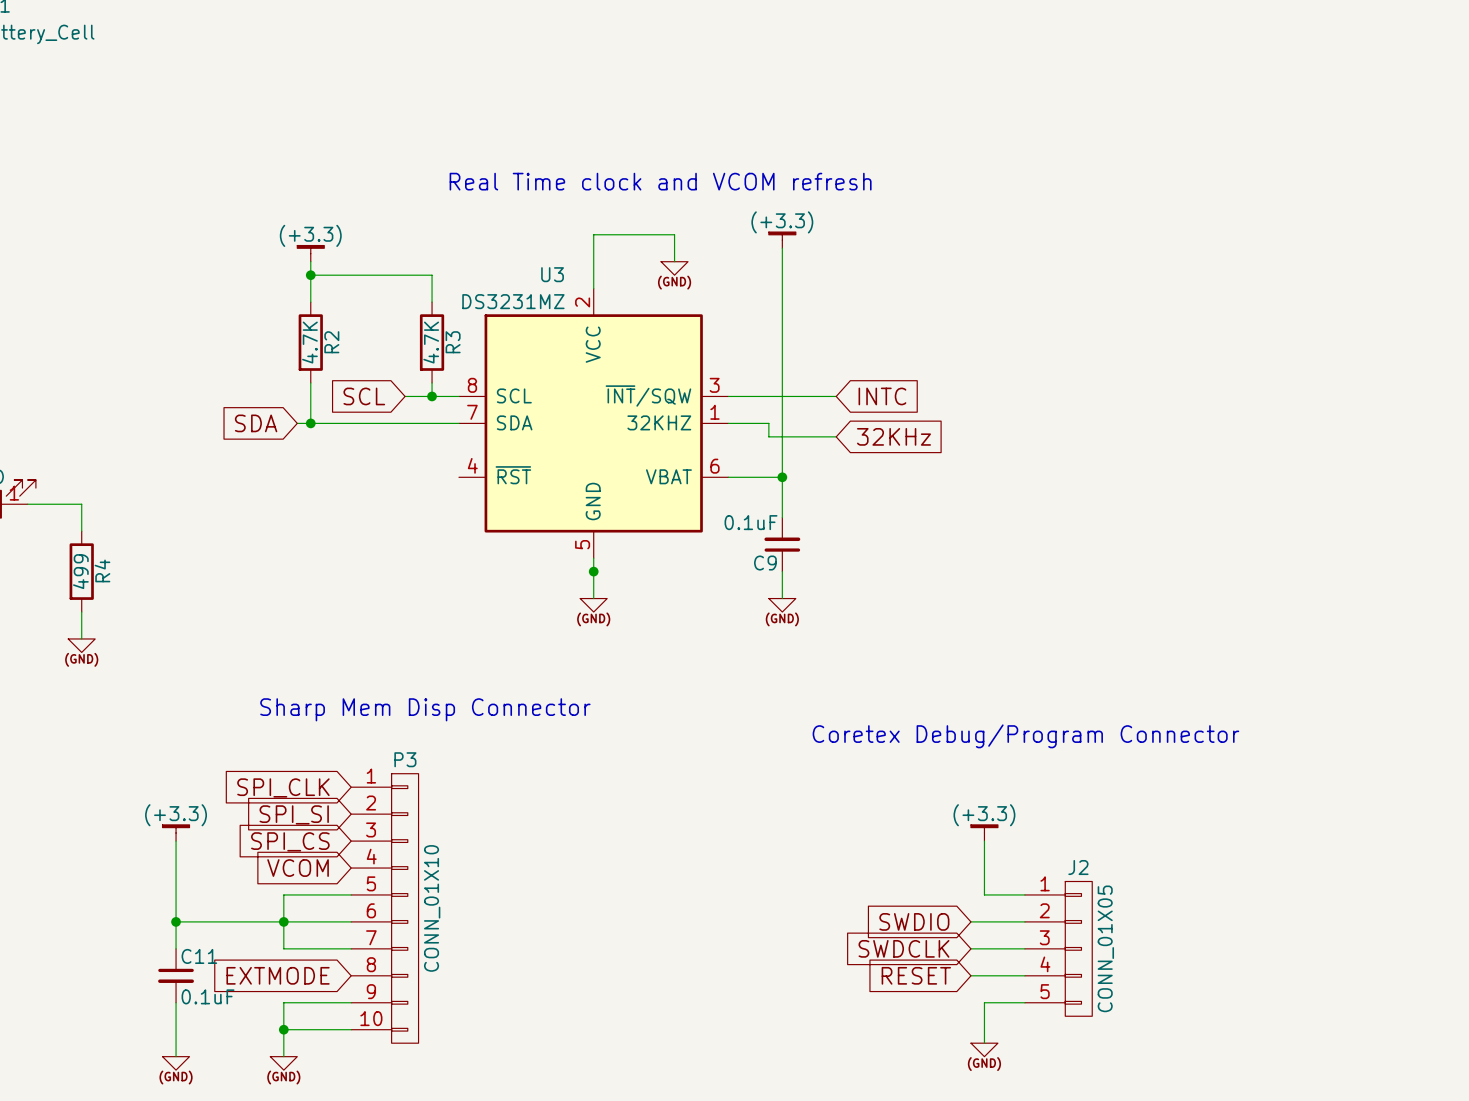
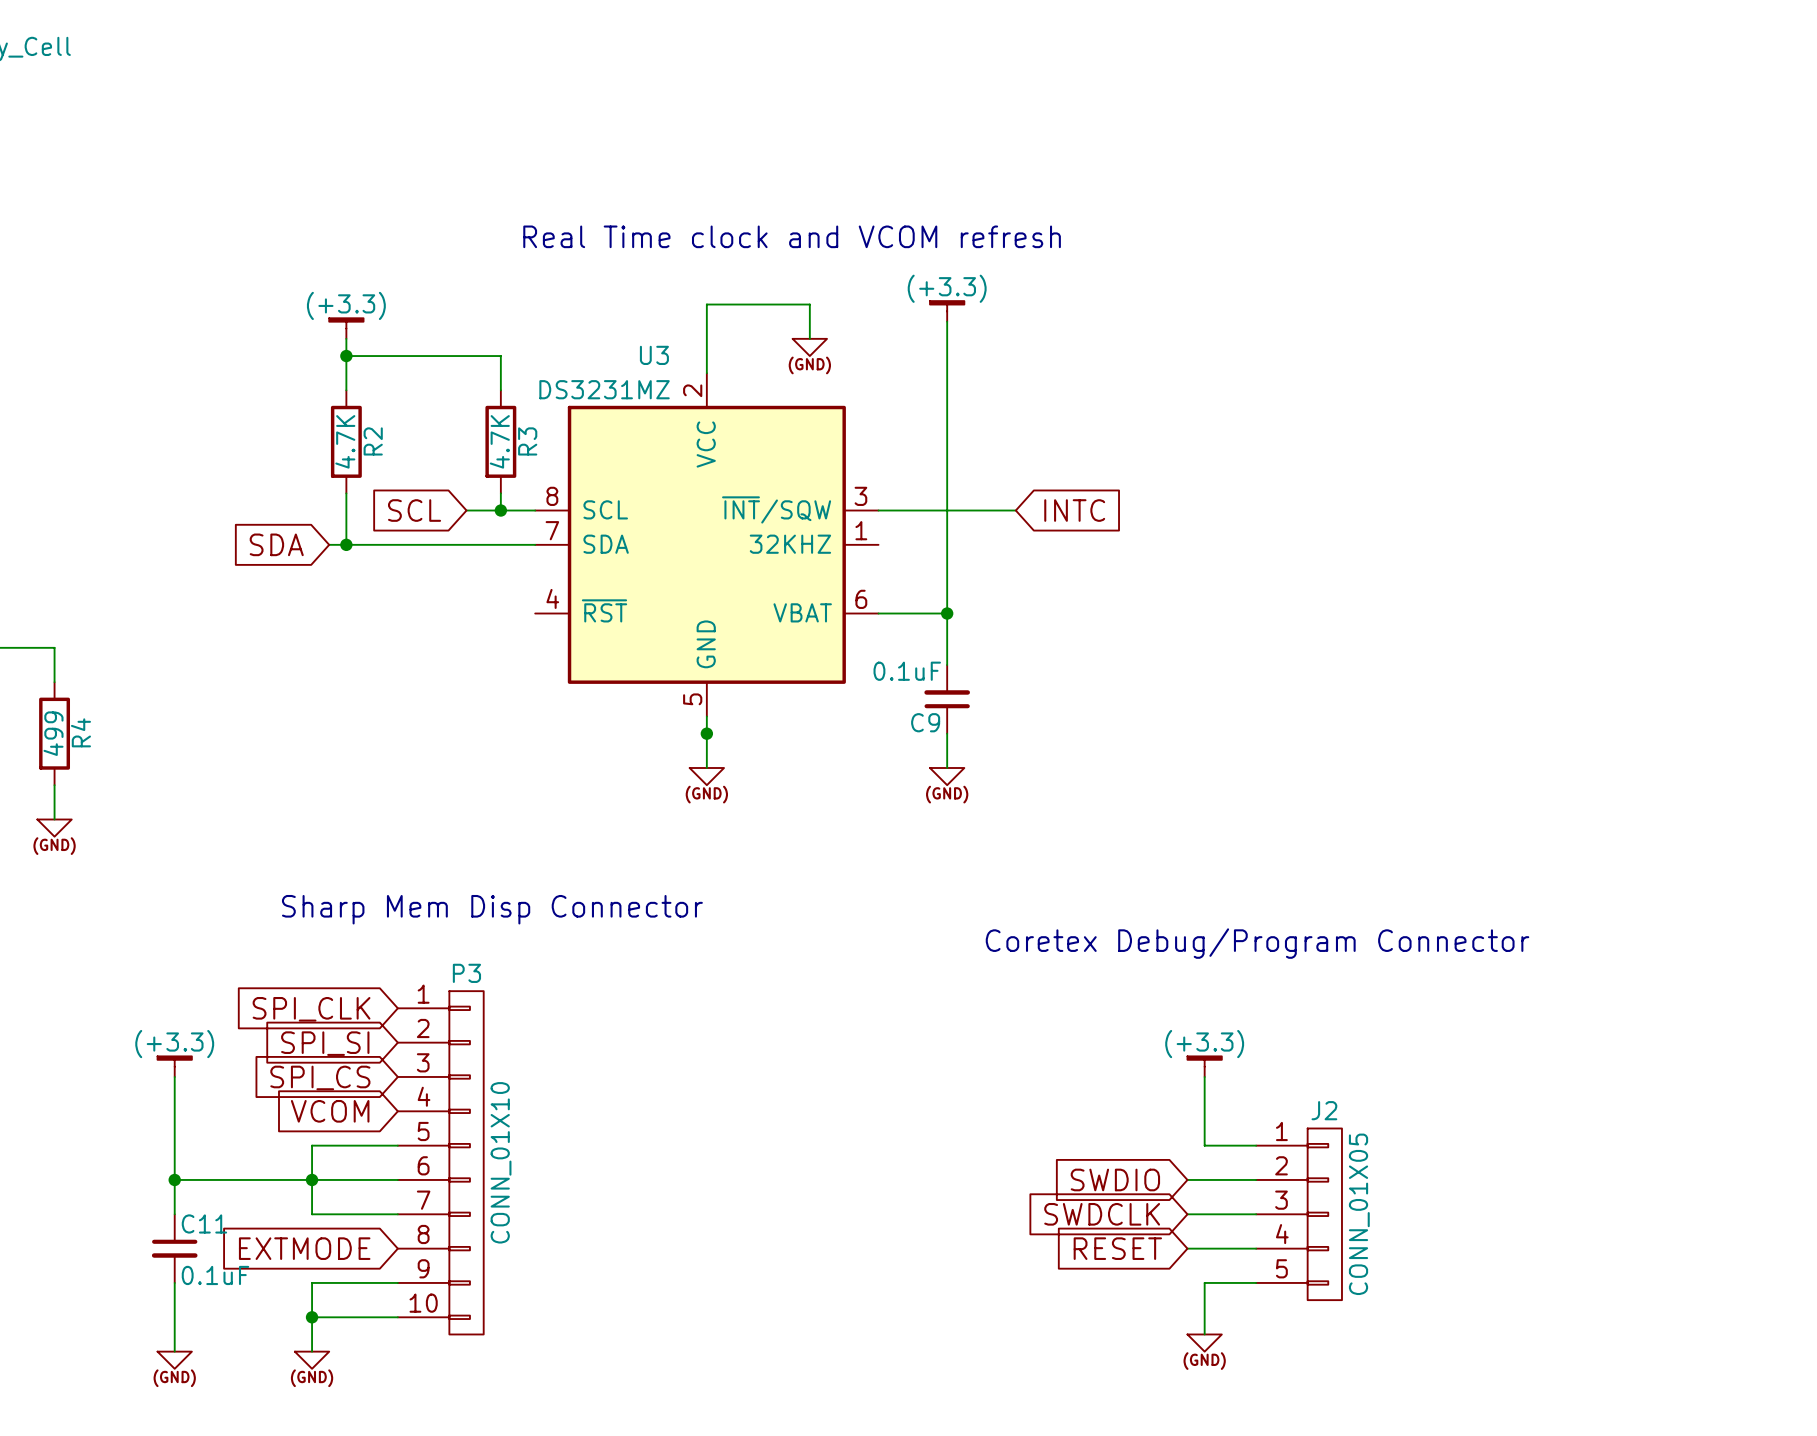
wire: (728, 423) (768, 423) (768, 436) (836, 436) -> none
global label: 32KHz (893, 436) -> none

